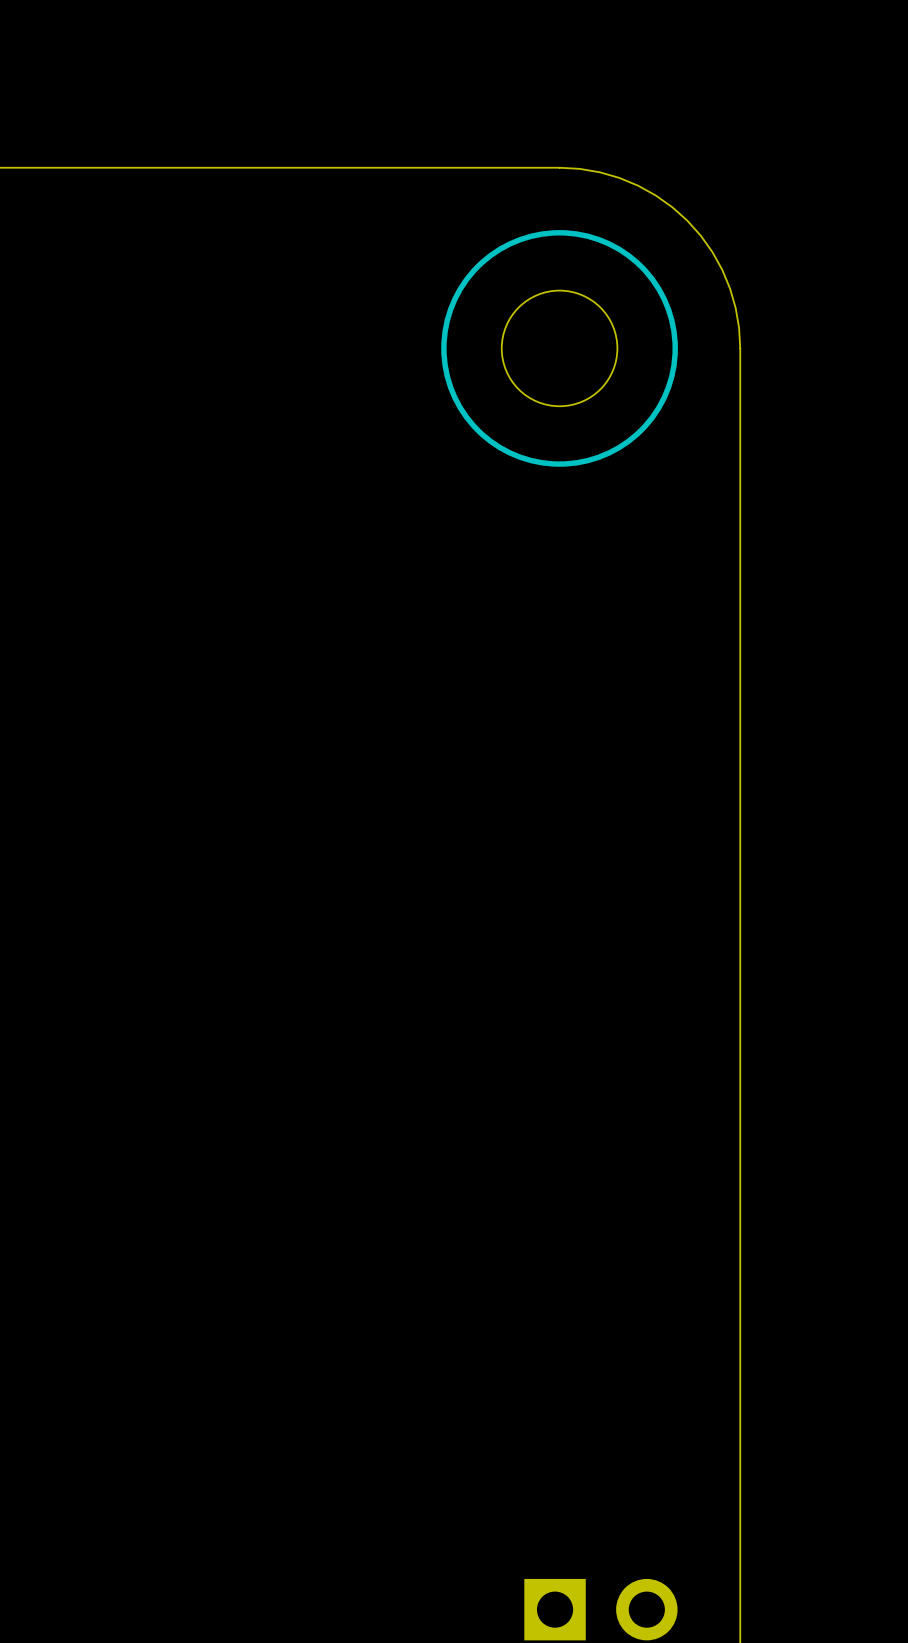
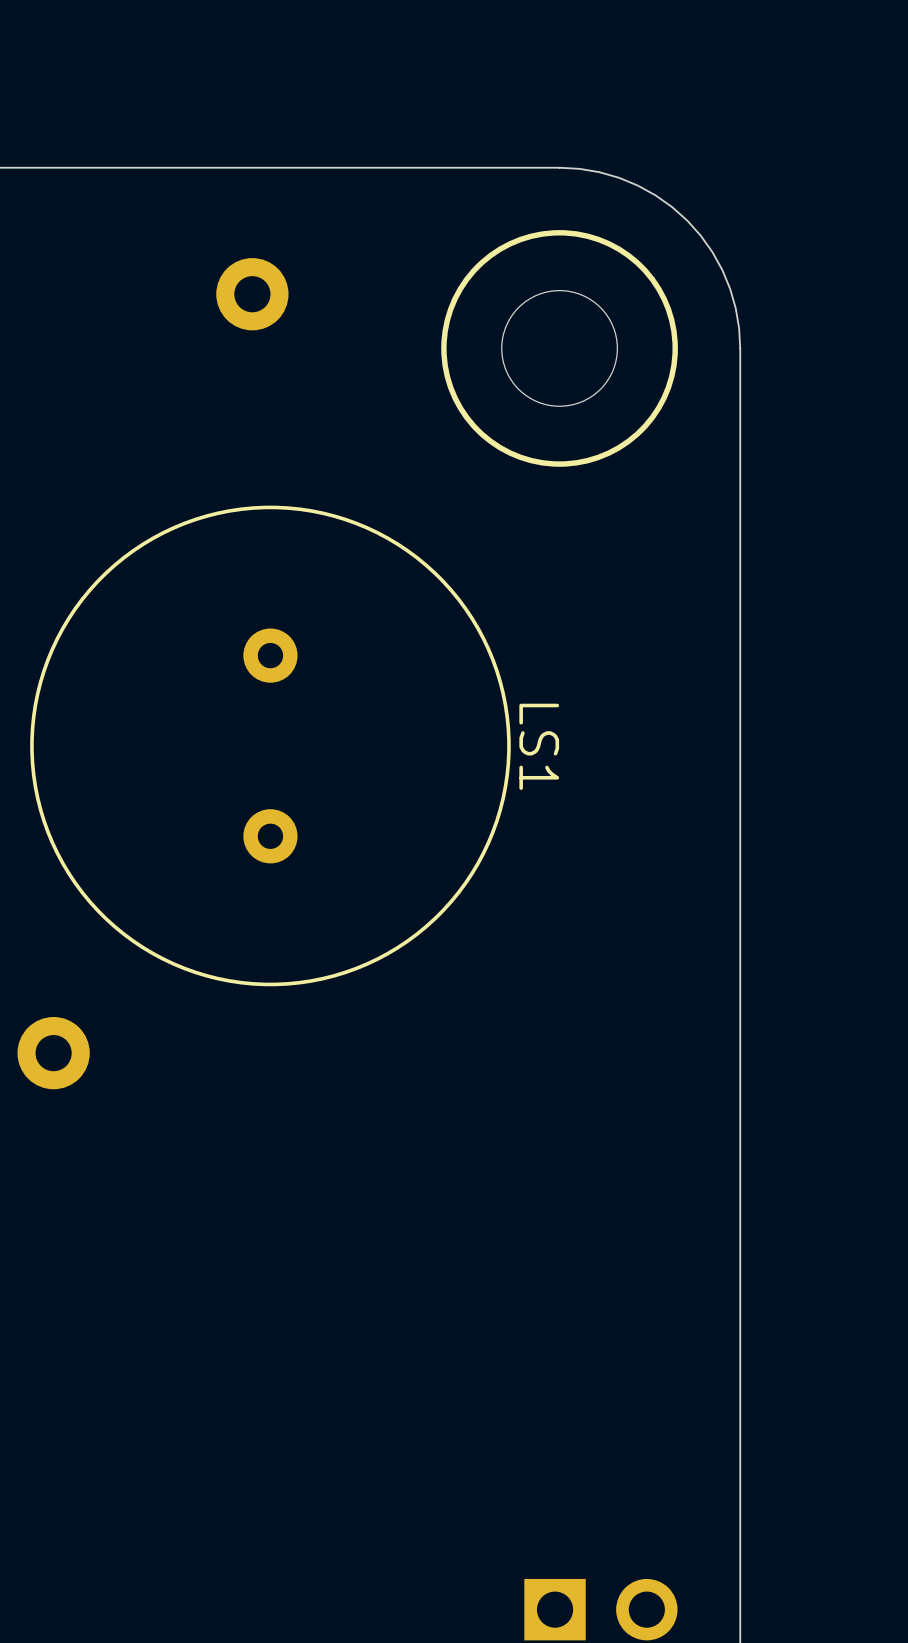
part: none -> (252, 294)
LS1: none -> (270, 745)
part: none -> (53, 1053)

